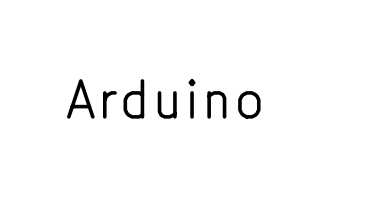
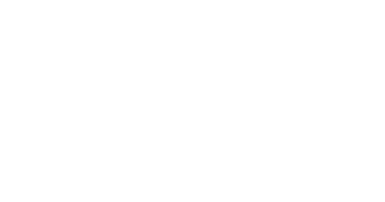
label: Arduino (163, 98) -> none

